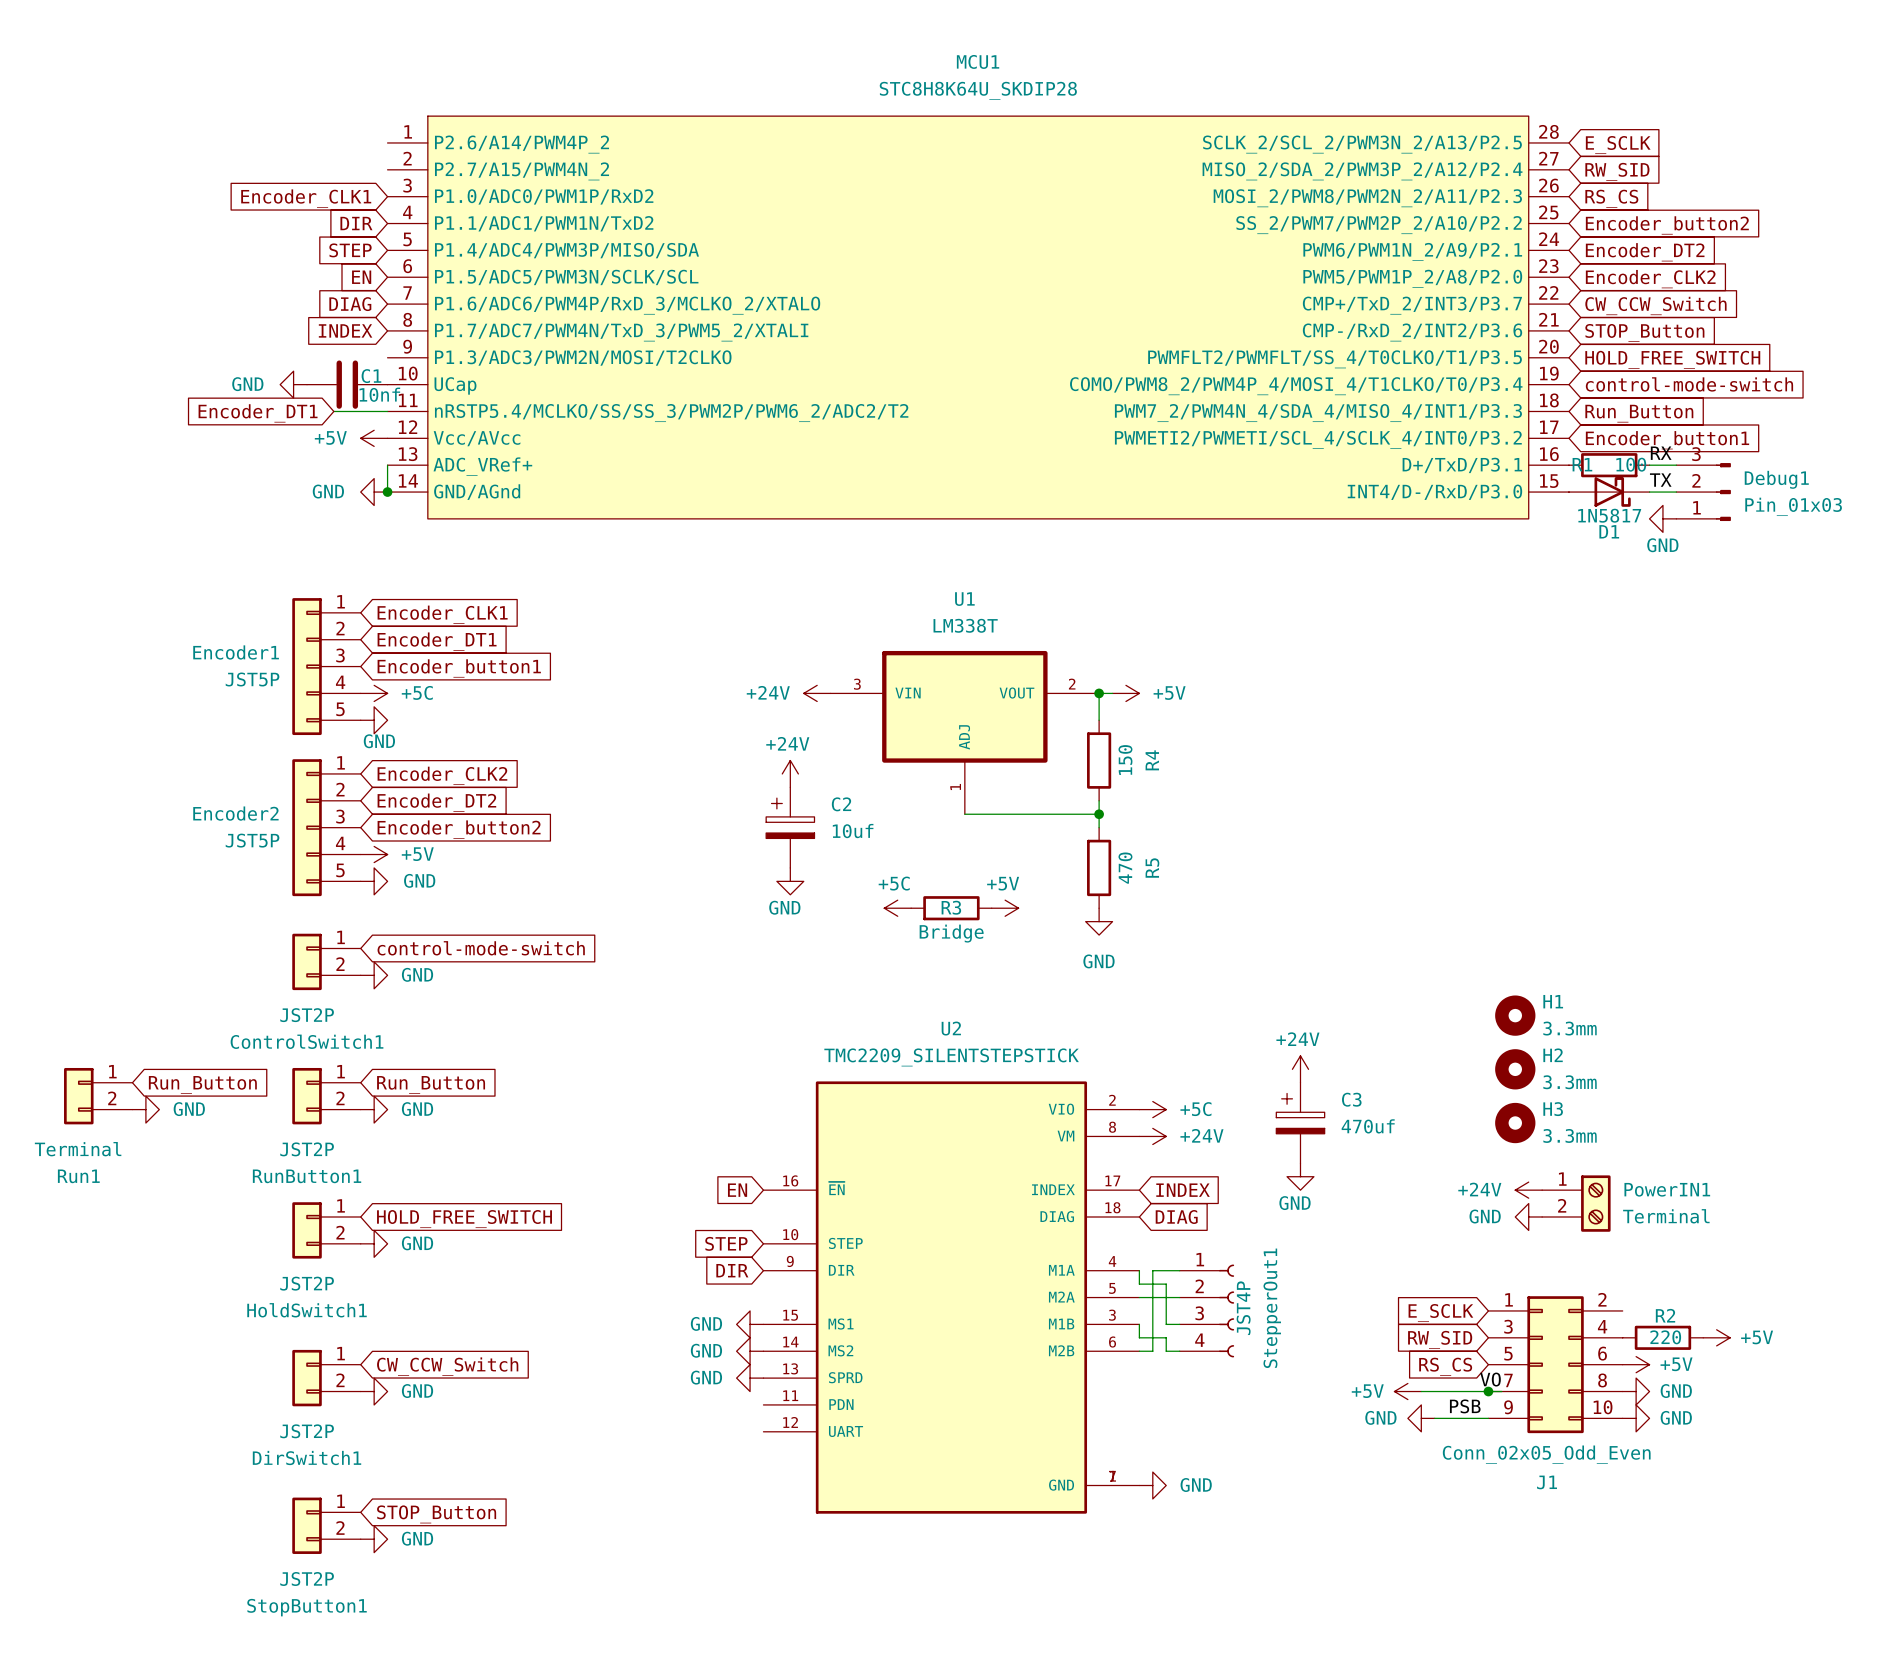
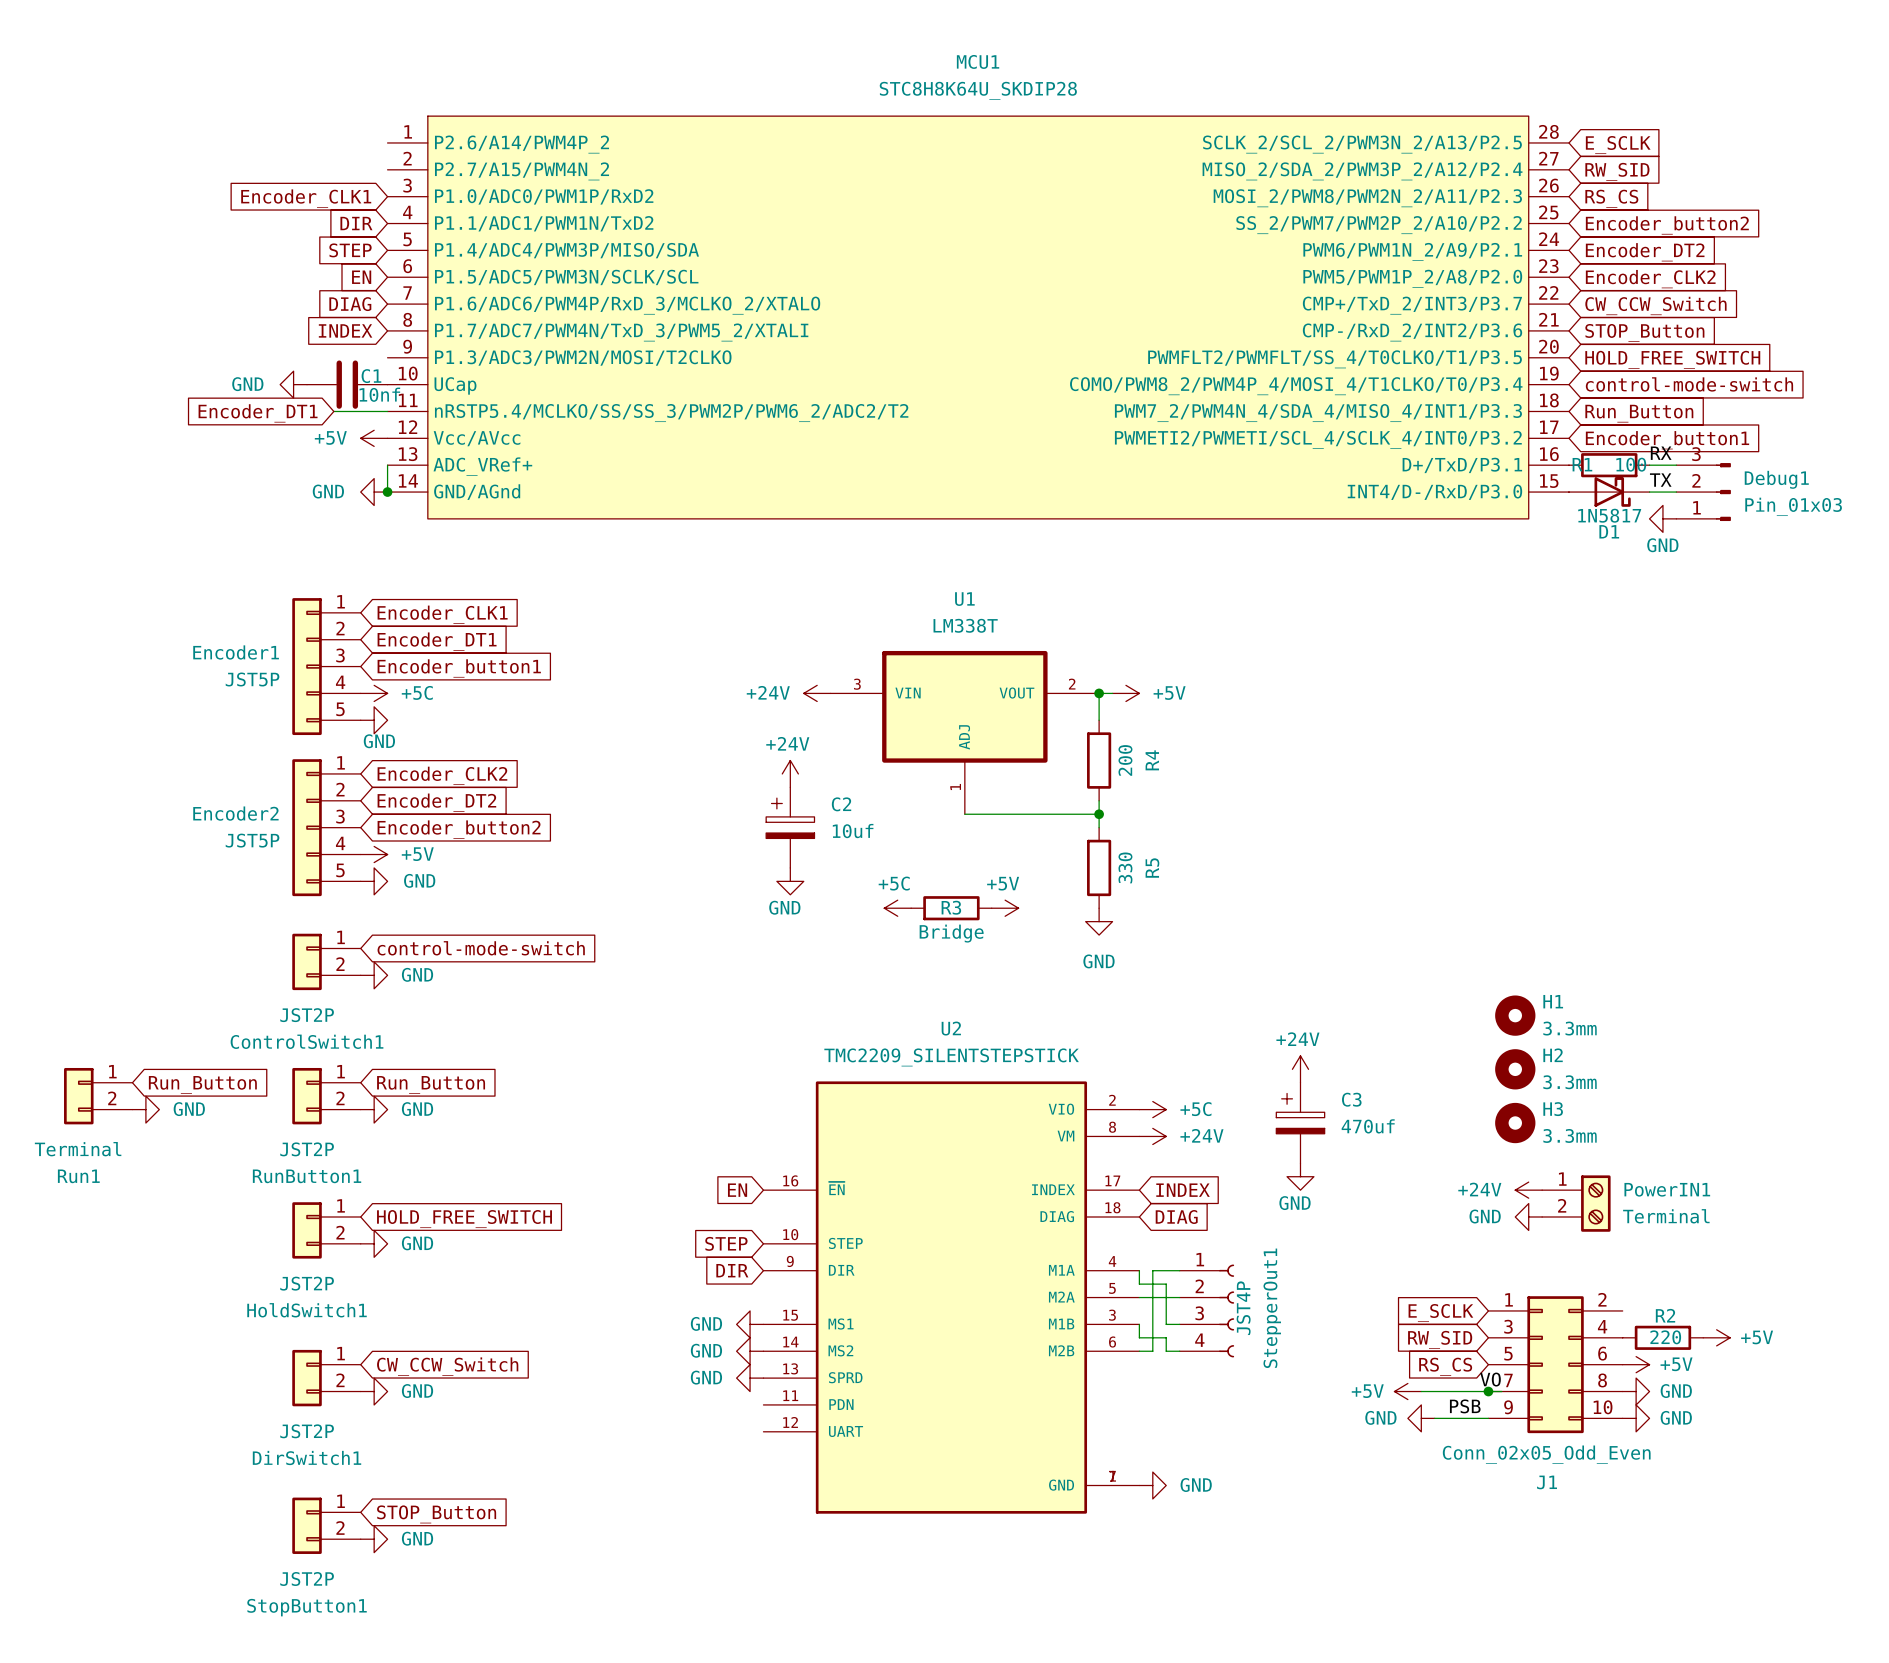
R4 value: 150 (1125, 760) -> 200 (1125, 760)
R5 value: 470 (1125, 868) -> 330 (1125, 867)

